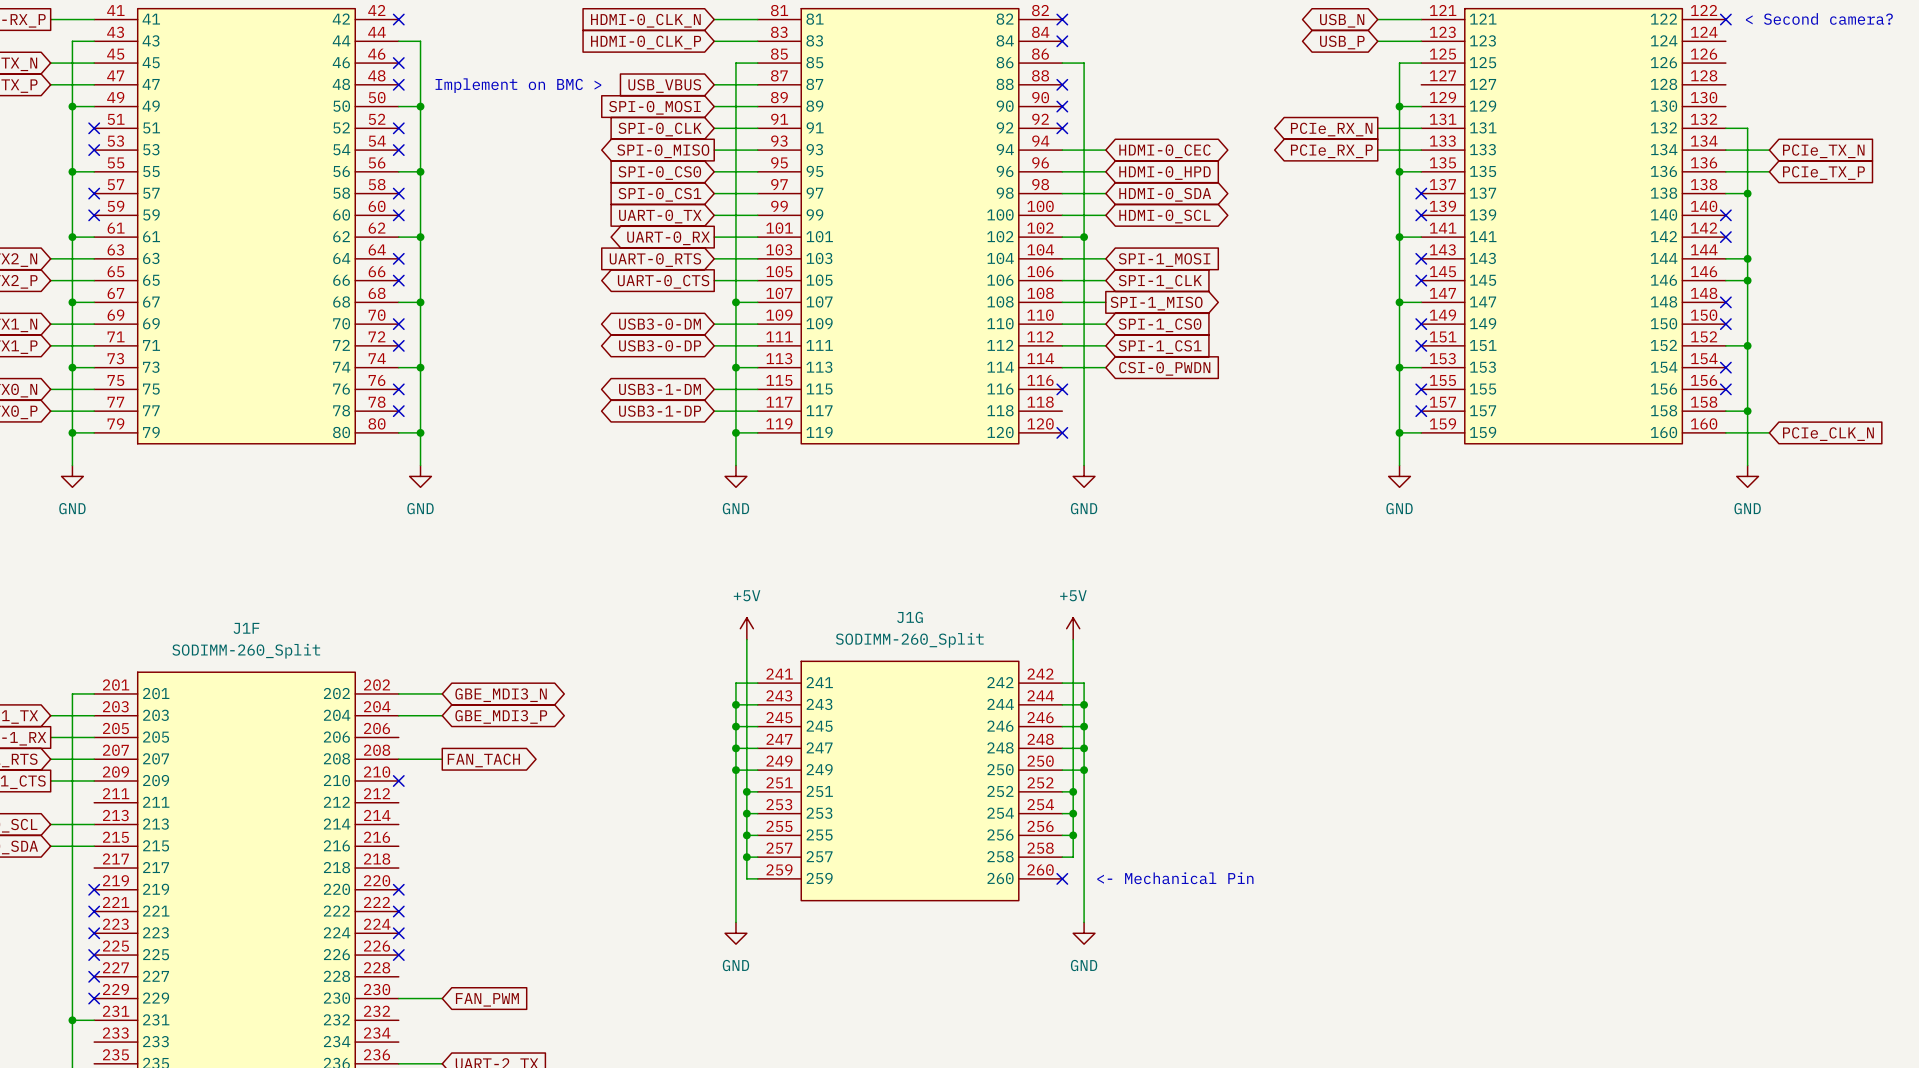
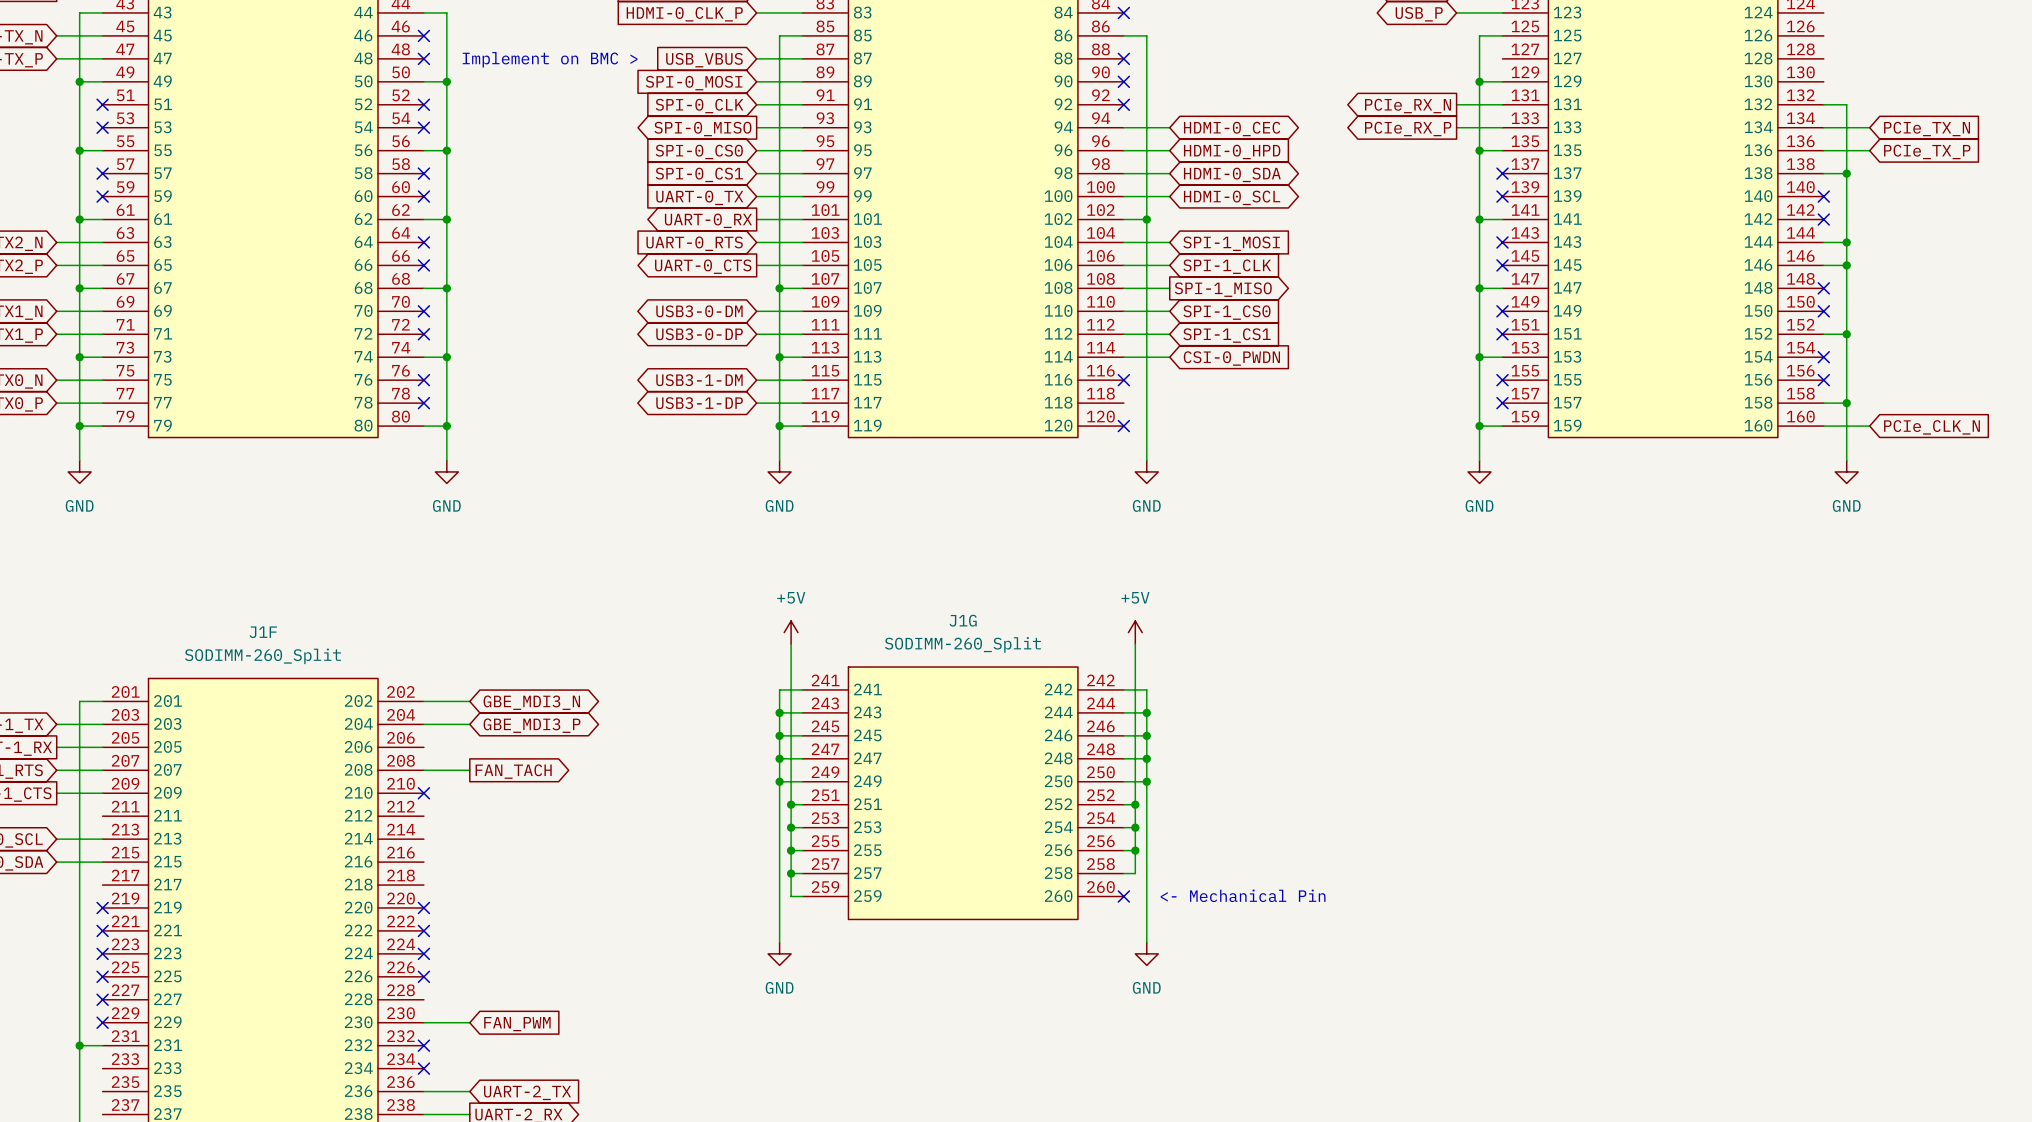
no-connect mark: none -> (423, 1045)
no-connect mark: none -> (423, 1068)

